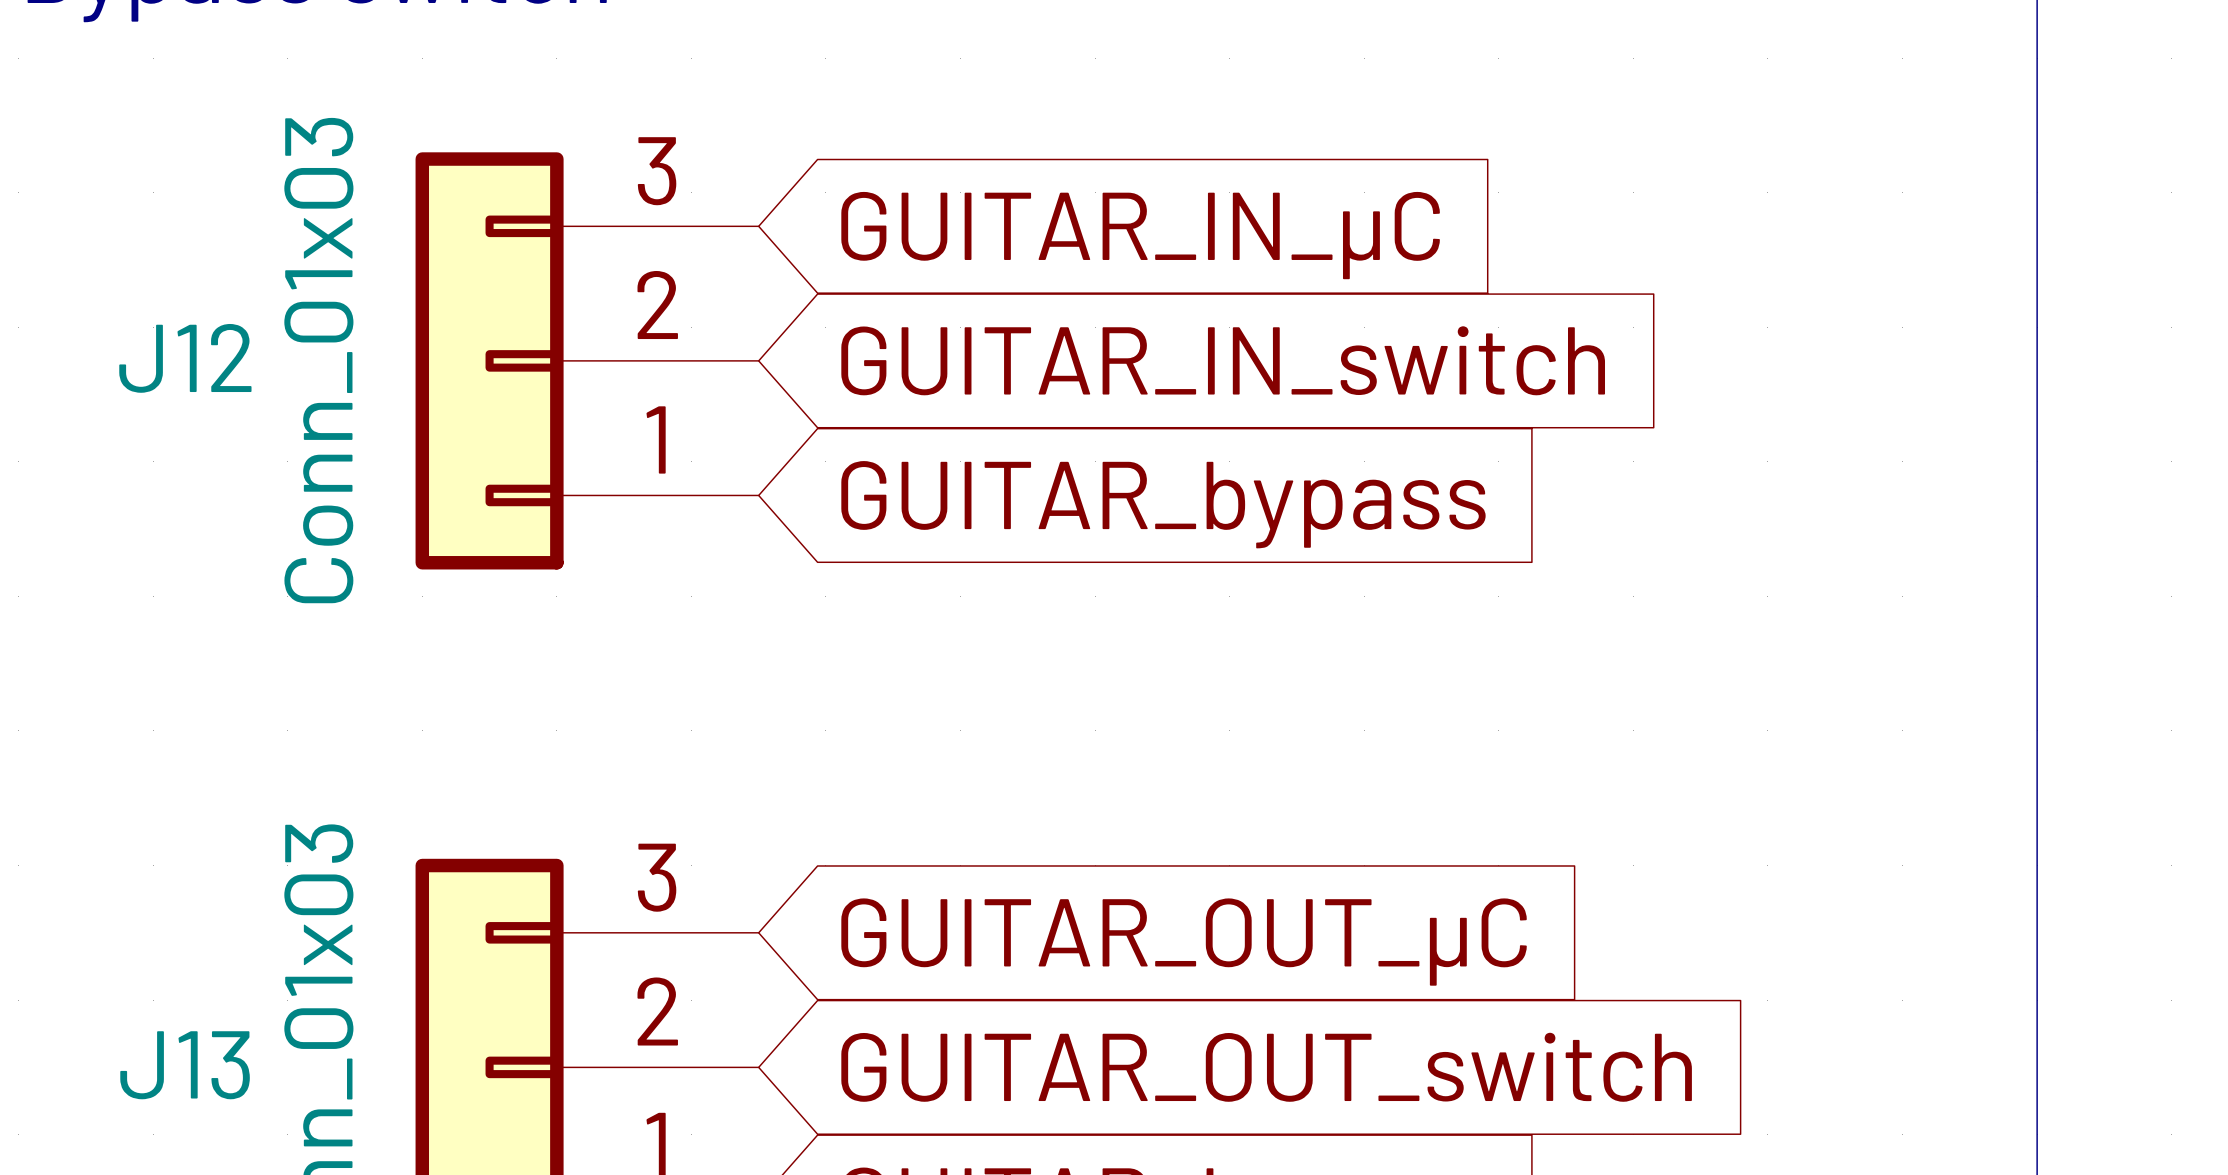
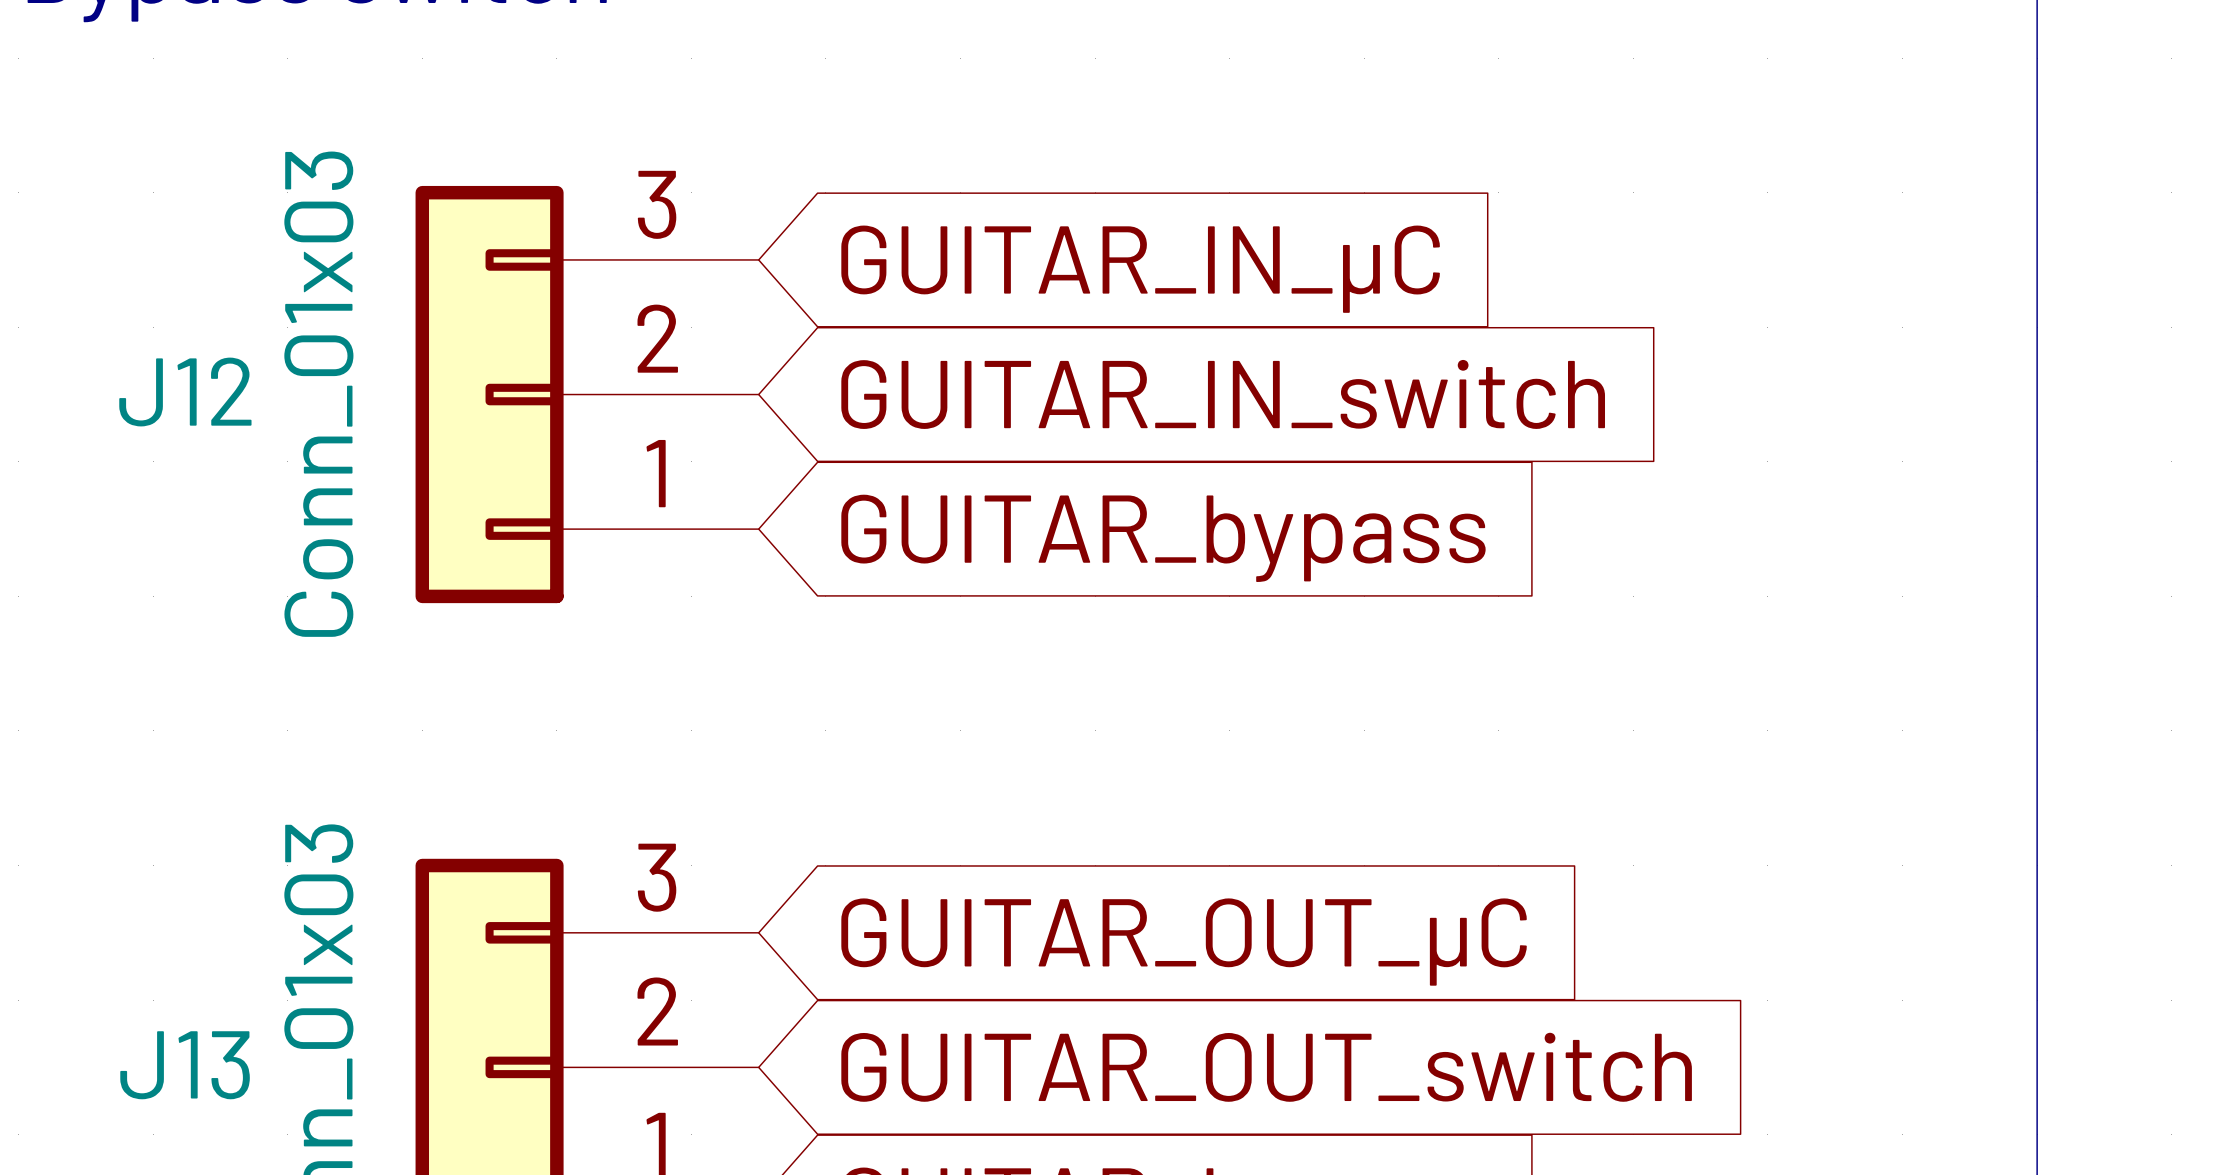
global label position: GUITAR_IN_µC (1140, 235) -> GUITAR_IN_µC (1140, 269)
J12 position: (587, 360) -> (587, 394)
global label position: GUITAR_IN_switch (1223, 360) -> GUITAR_IN_switch (1223, 394)
global label position: GUITAR_bypass (1163, 504) -> GUITAR_bypass (1163, 538)

